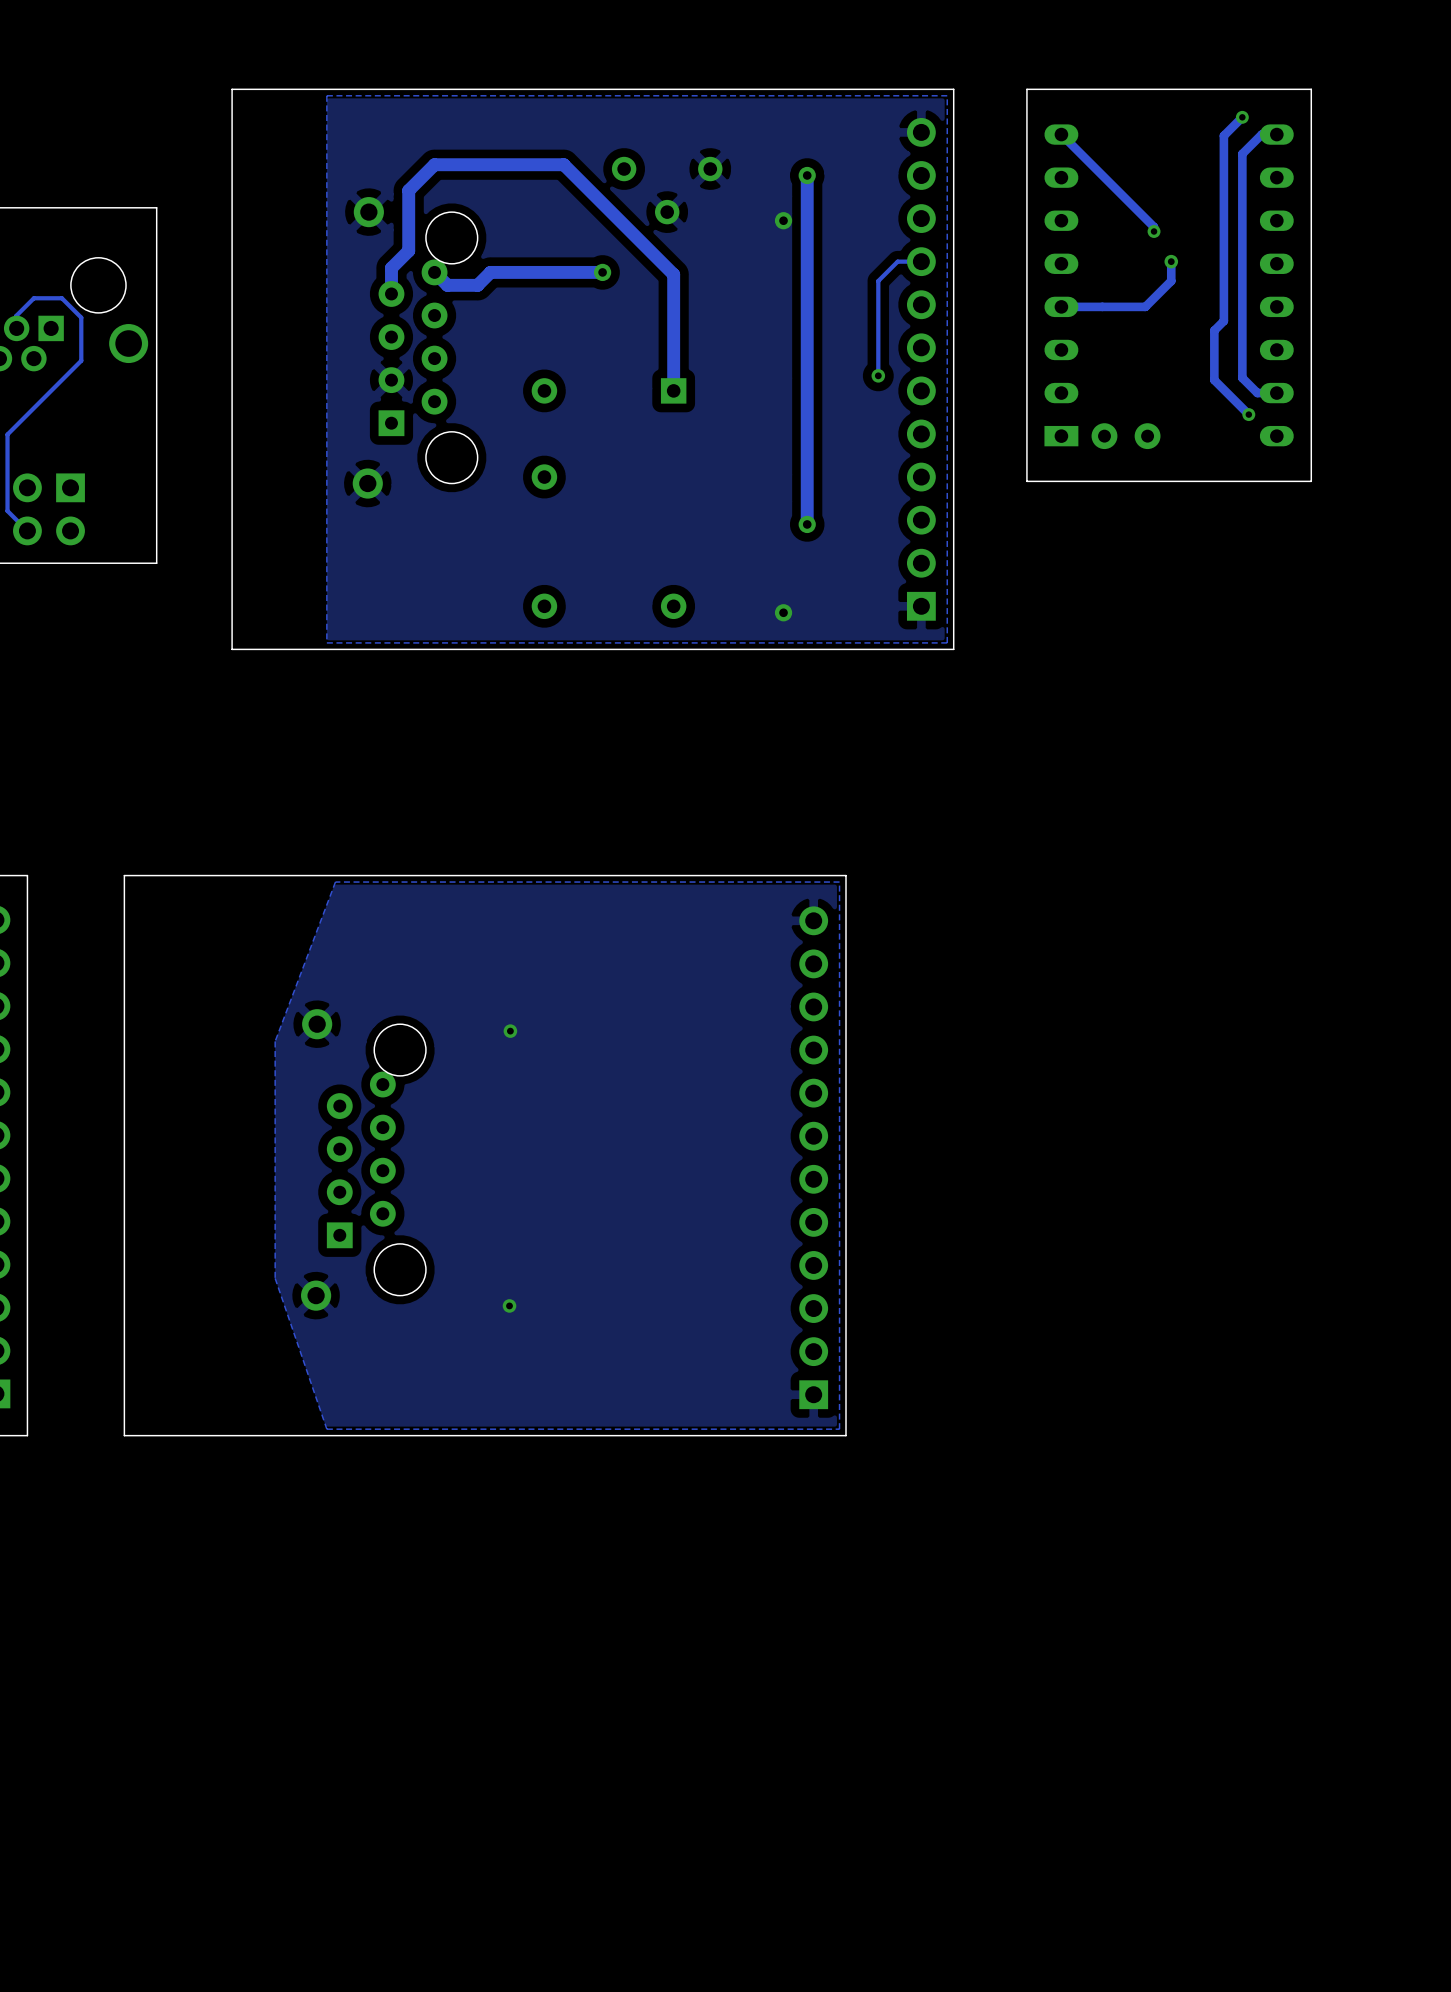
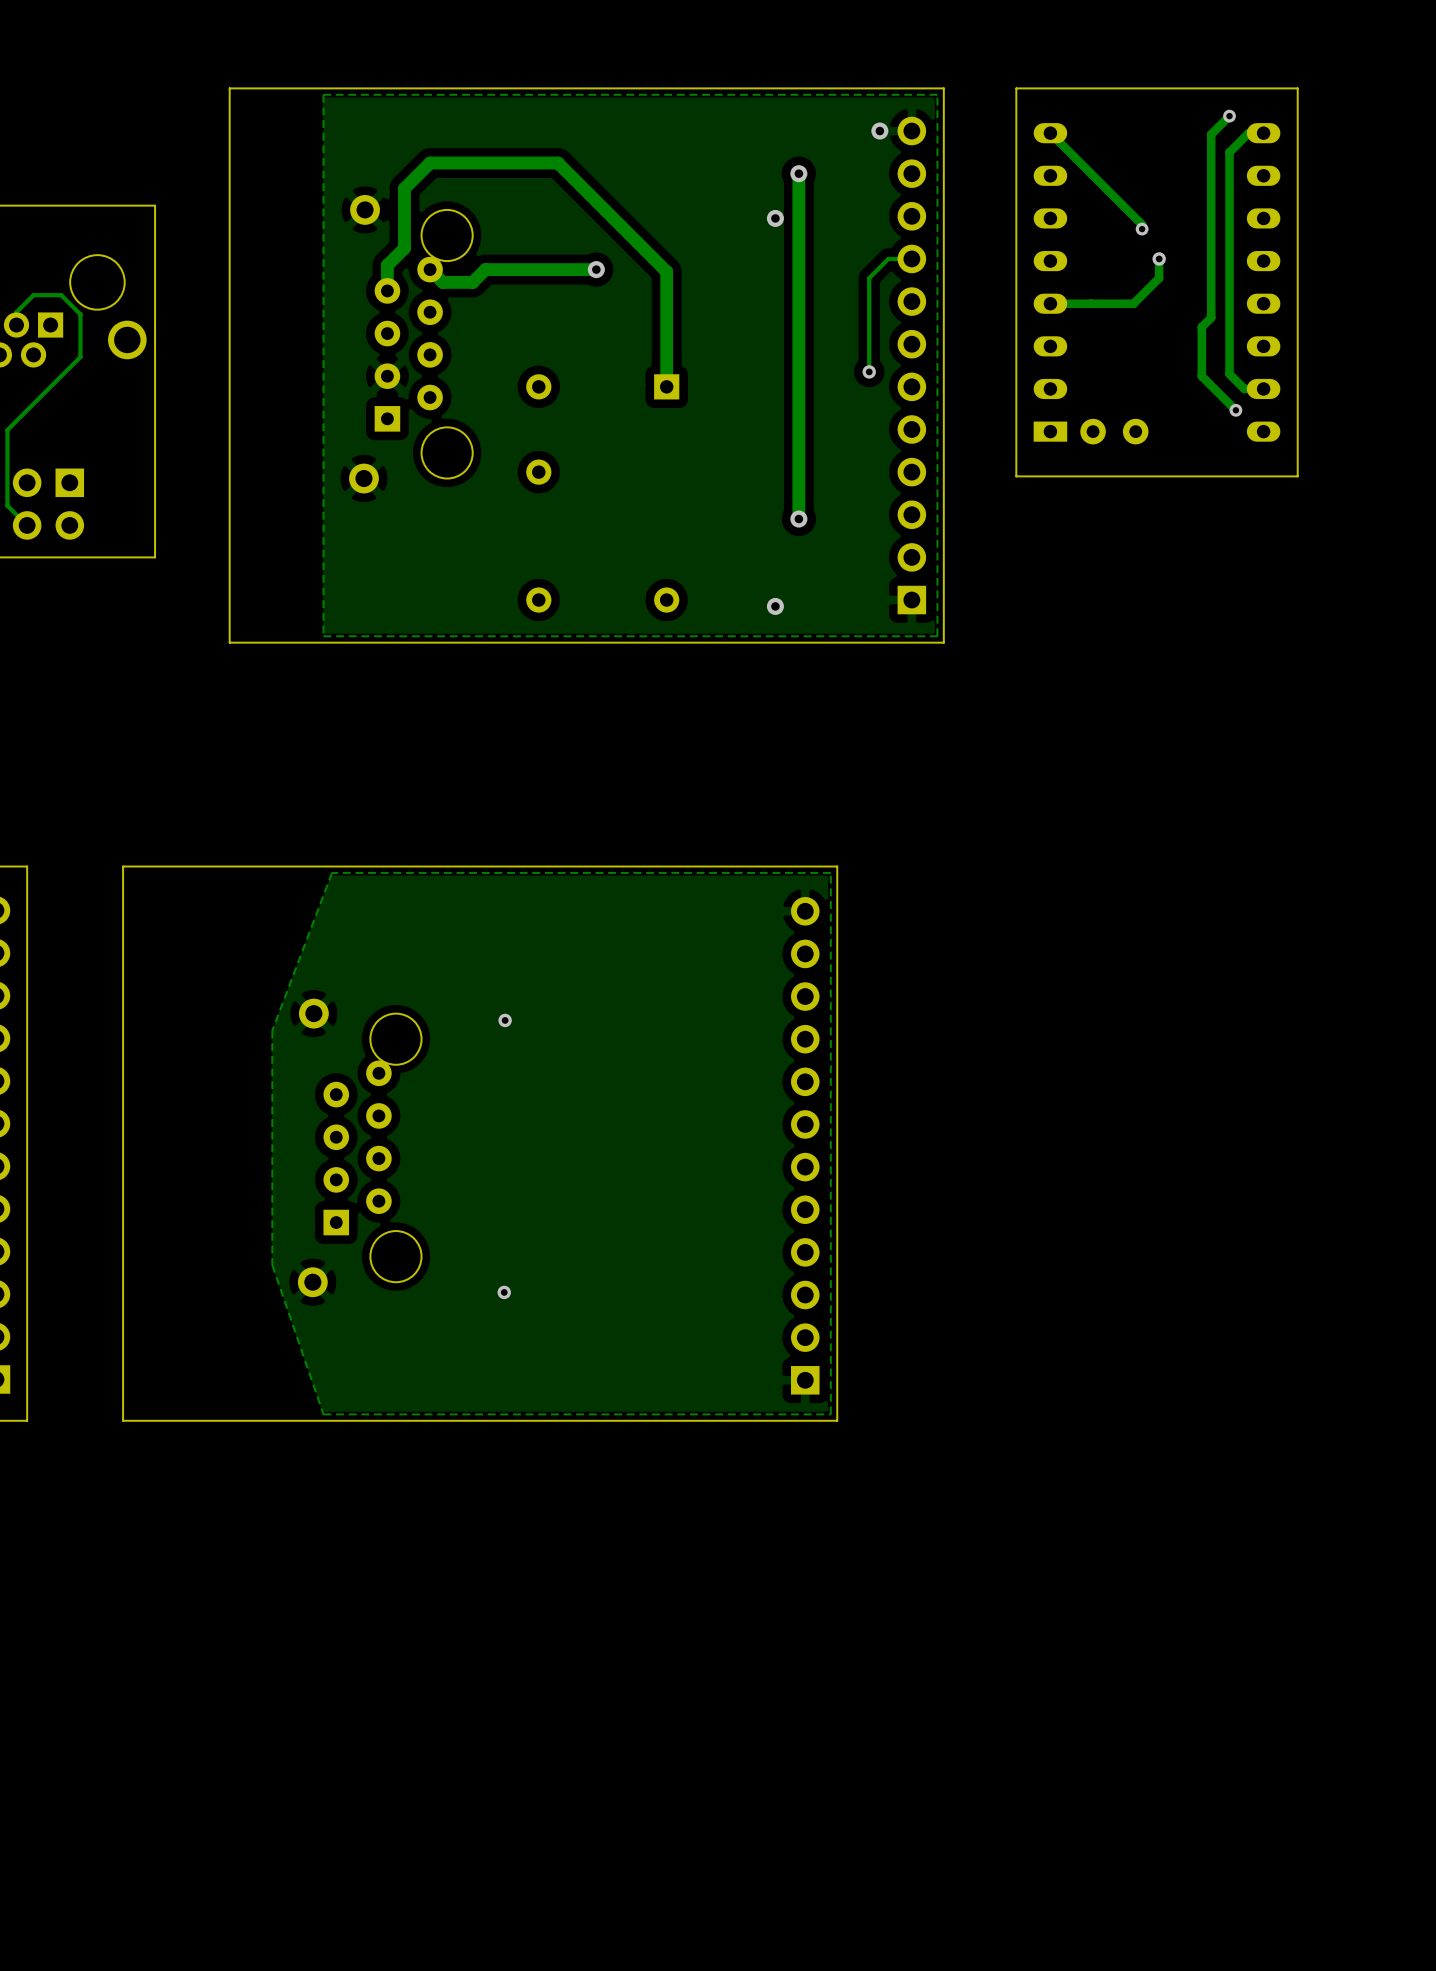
via: none -> (879, 131)
part: (667, 190) -> none

